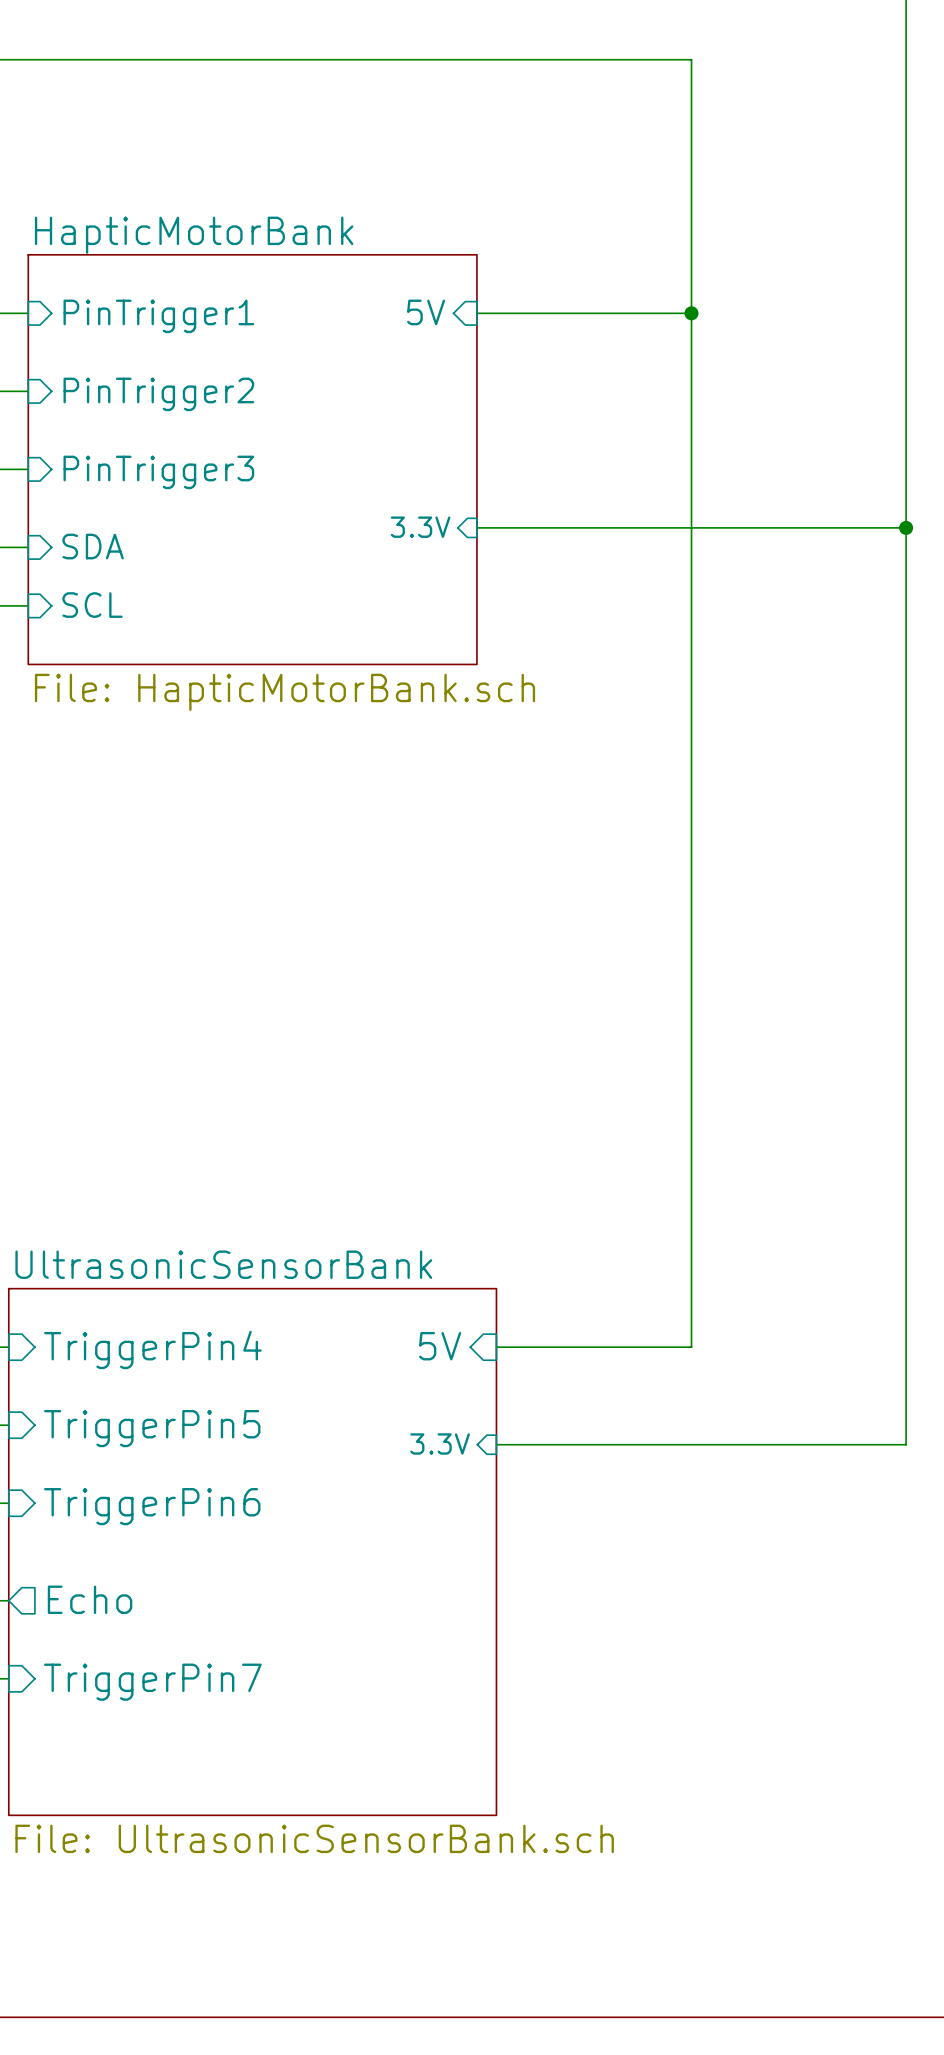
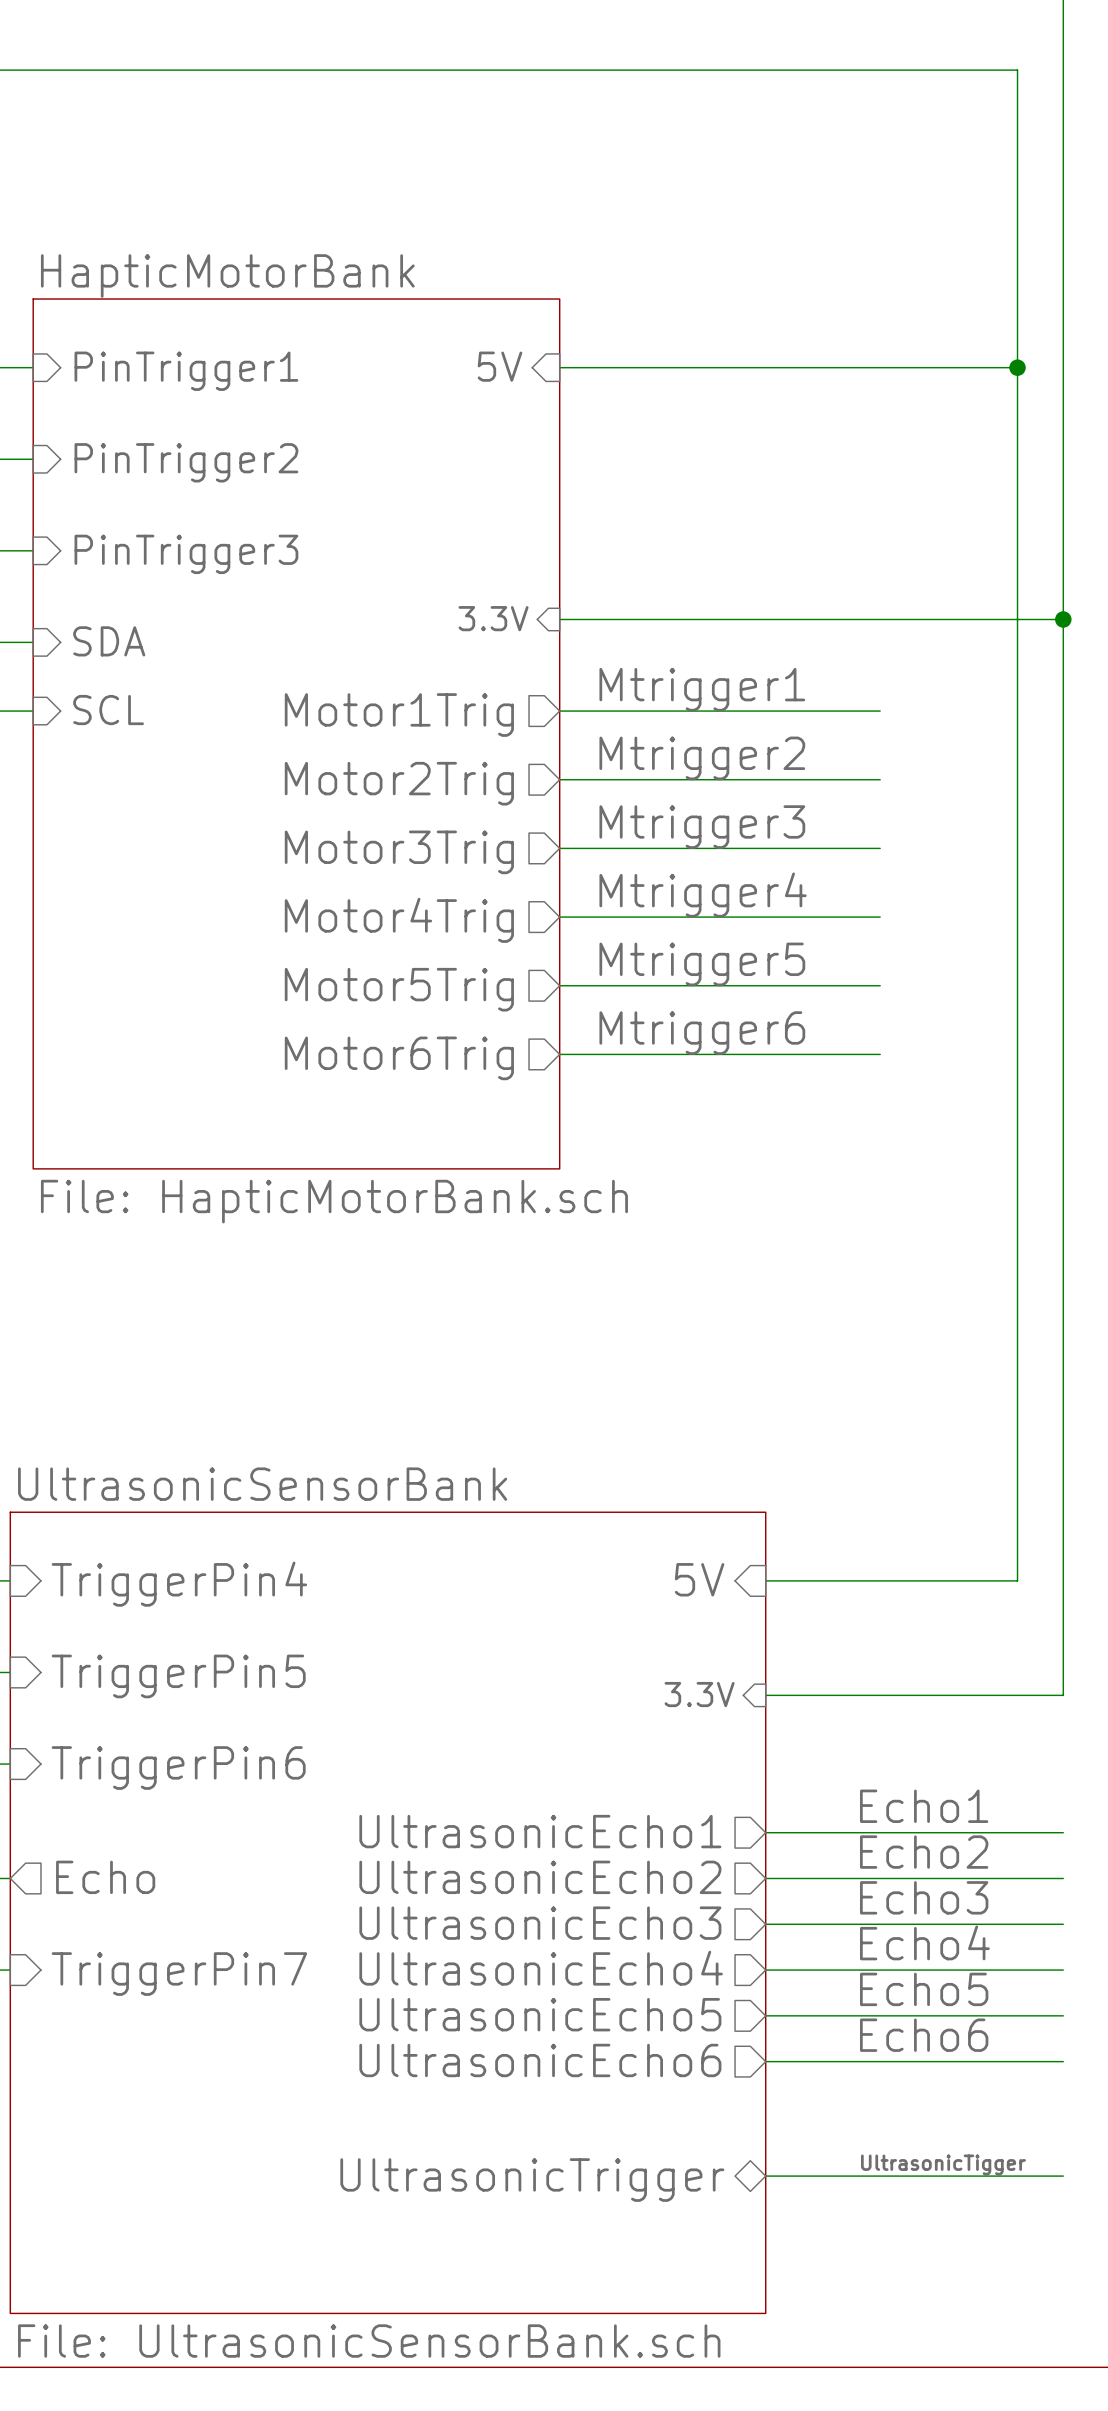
wire: (691, 59) (691, 1347) -> (811, 70) (1017, 70) (1017, 1580) (811, 1580)
wire: none -> (811, 367) (1017, 367)
junction: (691, 313) -> none
junction: none -> (1017, 367)
sheet HapticMotorBank: File: HapticMotorBank.sch (252, 459) -> none
label: none -> Mtrigger1 (702, 689)
wire: none -> (559, 711) (880, 711)
sheet pin: none -> Motor1Trig (399, 715)
sheet HapticMotorBank: none -> File: HapticMotorBank.sch (296, 733)
label: none -> Mtrigger2 (702, 758)
wire: none -> (559, 779) (880, 779)
sheet pin: none -> Motor2Trig (399, 783)
label: none -> Mtrigger3 (702, 827)
wire: none -> (559, 848) (880, 848)
sheet pin: none -> Motor3Trig (399, 852)
label: none -> Mtrigger4 (703, 895)
wire: none -> (559, 917) (880, 917)
sheet pin: none -> Motor4Trig (399, 920)
label: none -> Mtrigger5 (702, 964)
wire: none -> (559, 985) (880, 985)
sheet pin: none -> Motor5Trig (399, 989)
label: none -> Mtrigger6 (702, 1033)
wire: none -> (559, 1054) (880, 1054)
sheet pin: none -> Motor6Trig (399, 1058)
sheet pin position: 5V (440, 1346) -> 5V (699, 1579)
wire: (496, 1347) (652, 1347) -> none
sheet pin position: 3.3V (440, 1444) -> 3.3V (699, 1694)
wire: (496, 1444) (652, 1444) -> none
label: none -> Echo1 (924, 1806)
sheet UltrasonicSensorBank: File: UltrasonicSensorBank.sch (252, 1552) -> none
sheet pin: none -> UltrasonicEcho1 (540, 1831)
wire: none -> (765, 1832) (1063, 1832)
label: none -> Echo2 (924, 1852)
sheet pin: none -> UltrasonicEcho2 (540, 1877)
wire: none -> (765, 1878) (1063, 1878)
label: none -> Echo3 (924, 1897)
sheet UltrasonicSensorBank: none -> File: UltrasonicSensorBank.sch (388, 1912)
sheet pin: none -> UltrasonicEcho3 (540, 1923)
wire: none -> (765, 1924) (1063, 1924)
label: none -> Echo4 (924, 1942)
sheet pin: none -> UltrasonicEcho4 (541, 1968)
wire: none -> (765, 1970) (1063, 1970)
label: none -> Echo5 (924, 1989)
sheet pin: none -> UltrasonicEcho5 (540, 2014)
wire: none -> (765, 2015) (1063, 2015)
label: none -> Echo6 (924, 2035)
sheet pin: none -> UltrasonicEcho6 (540, 2060)
wire: none -> (765, 2061) (1063, 2061)
label: none -> UltrasonicTigger (943, 2165)
wire: none -> (765, 2176) (1063, 2176)
sheet pin: none -> UltrasonicTrigger (532, 2180)

